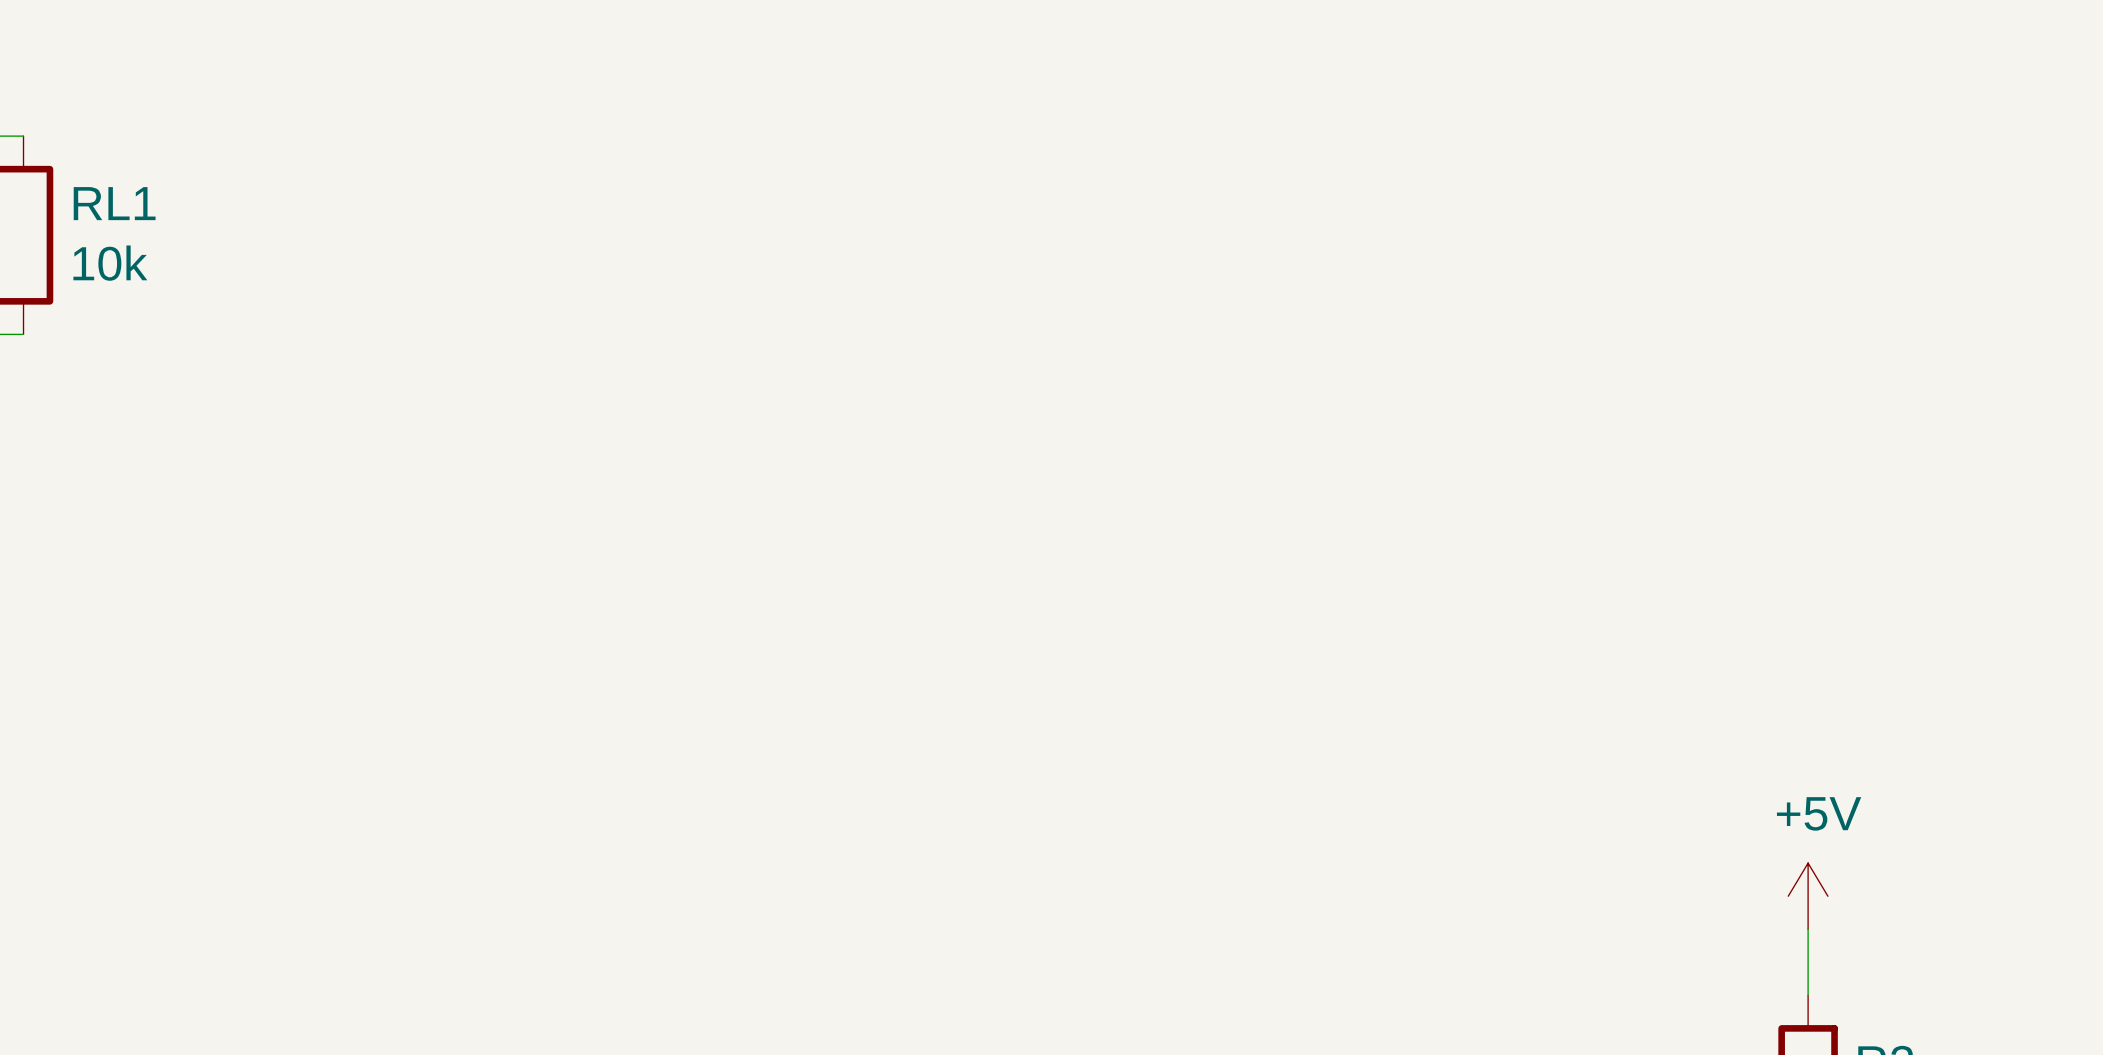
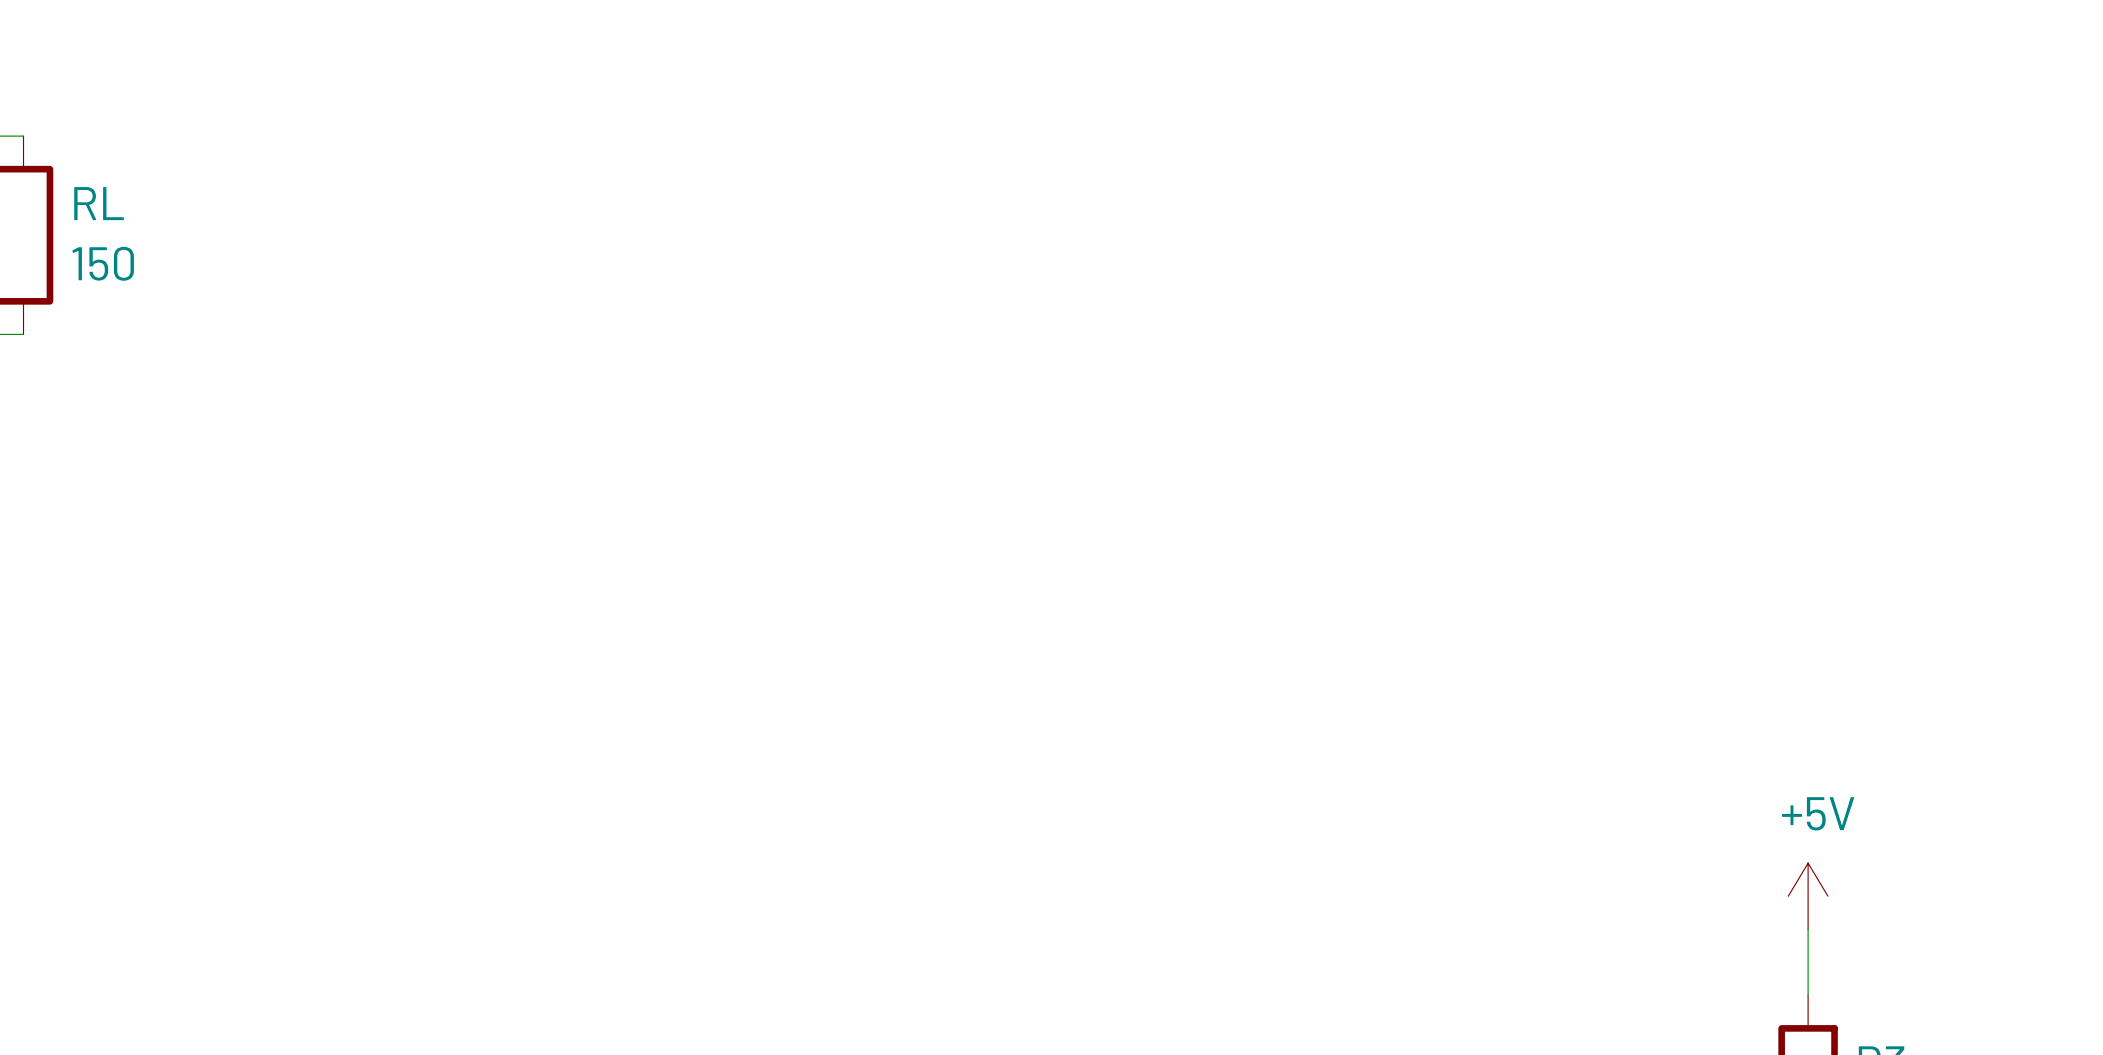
RL1 name: RL1 (114, 203) -> RL (99, 203)
RL1 value: 10k (110, 263) -> 150 (103, 263)

